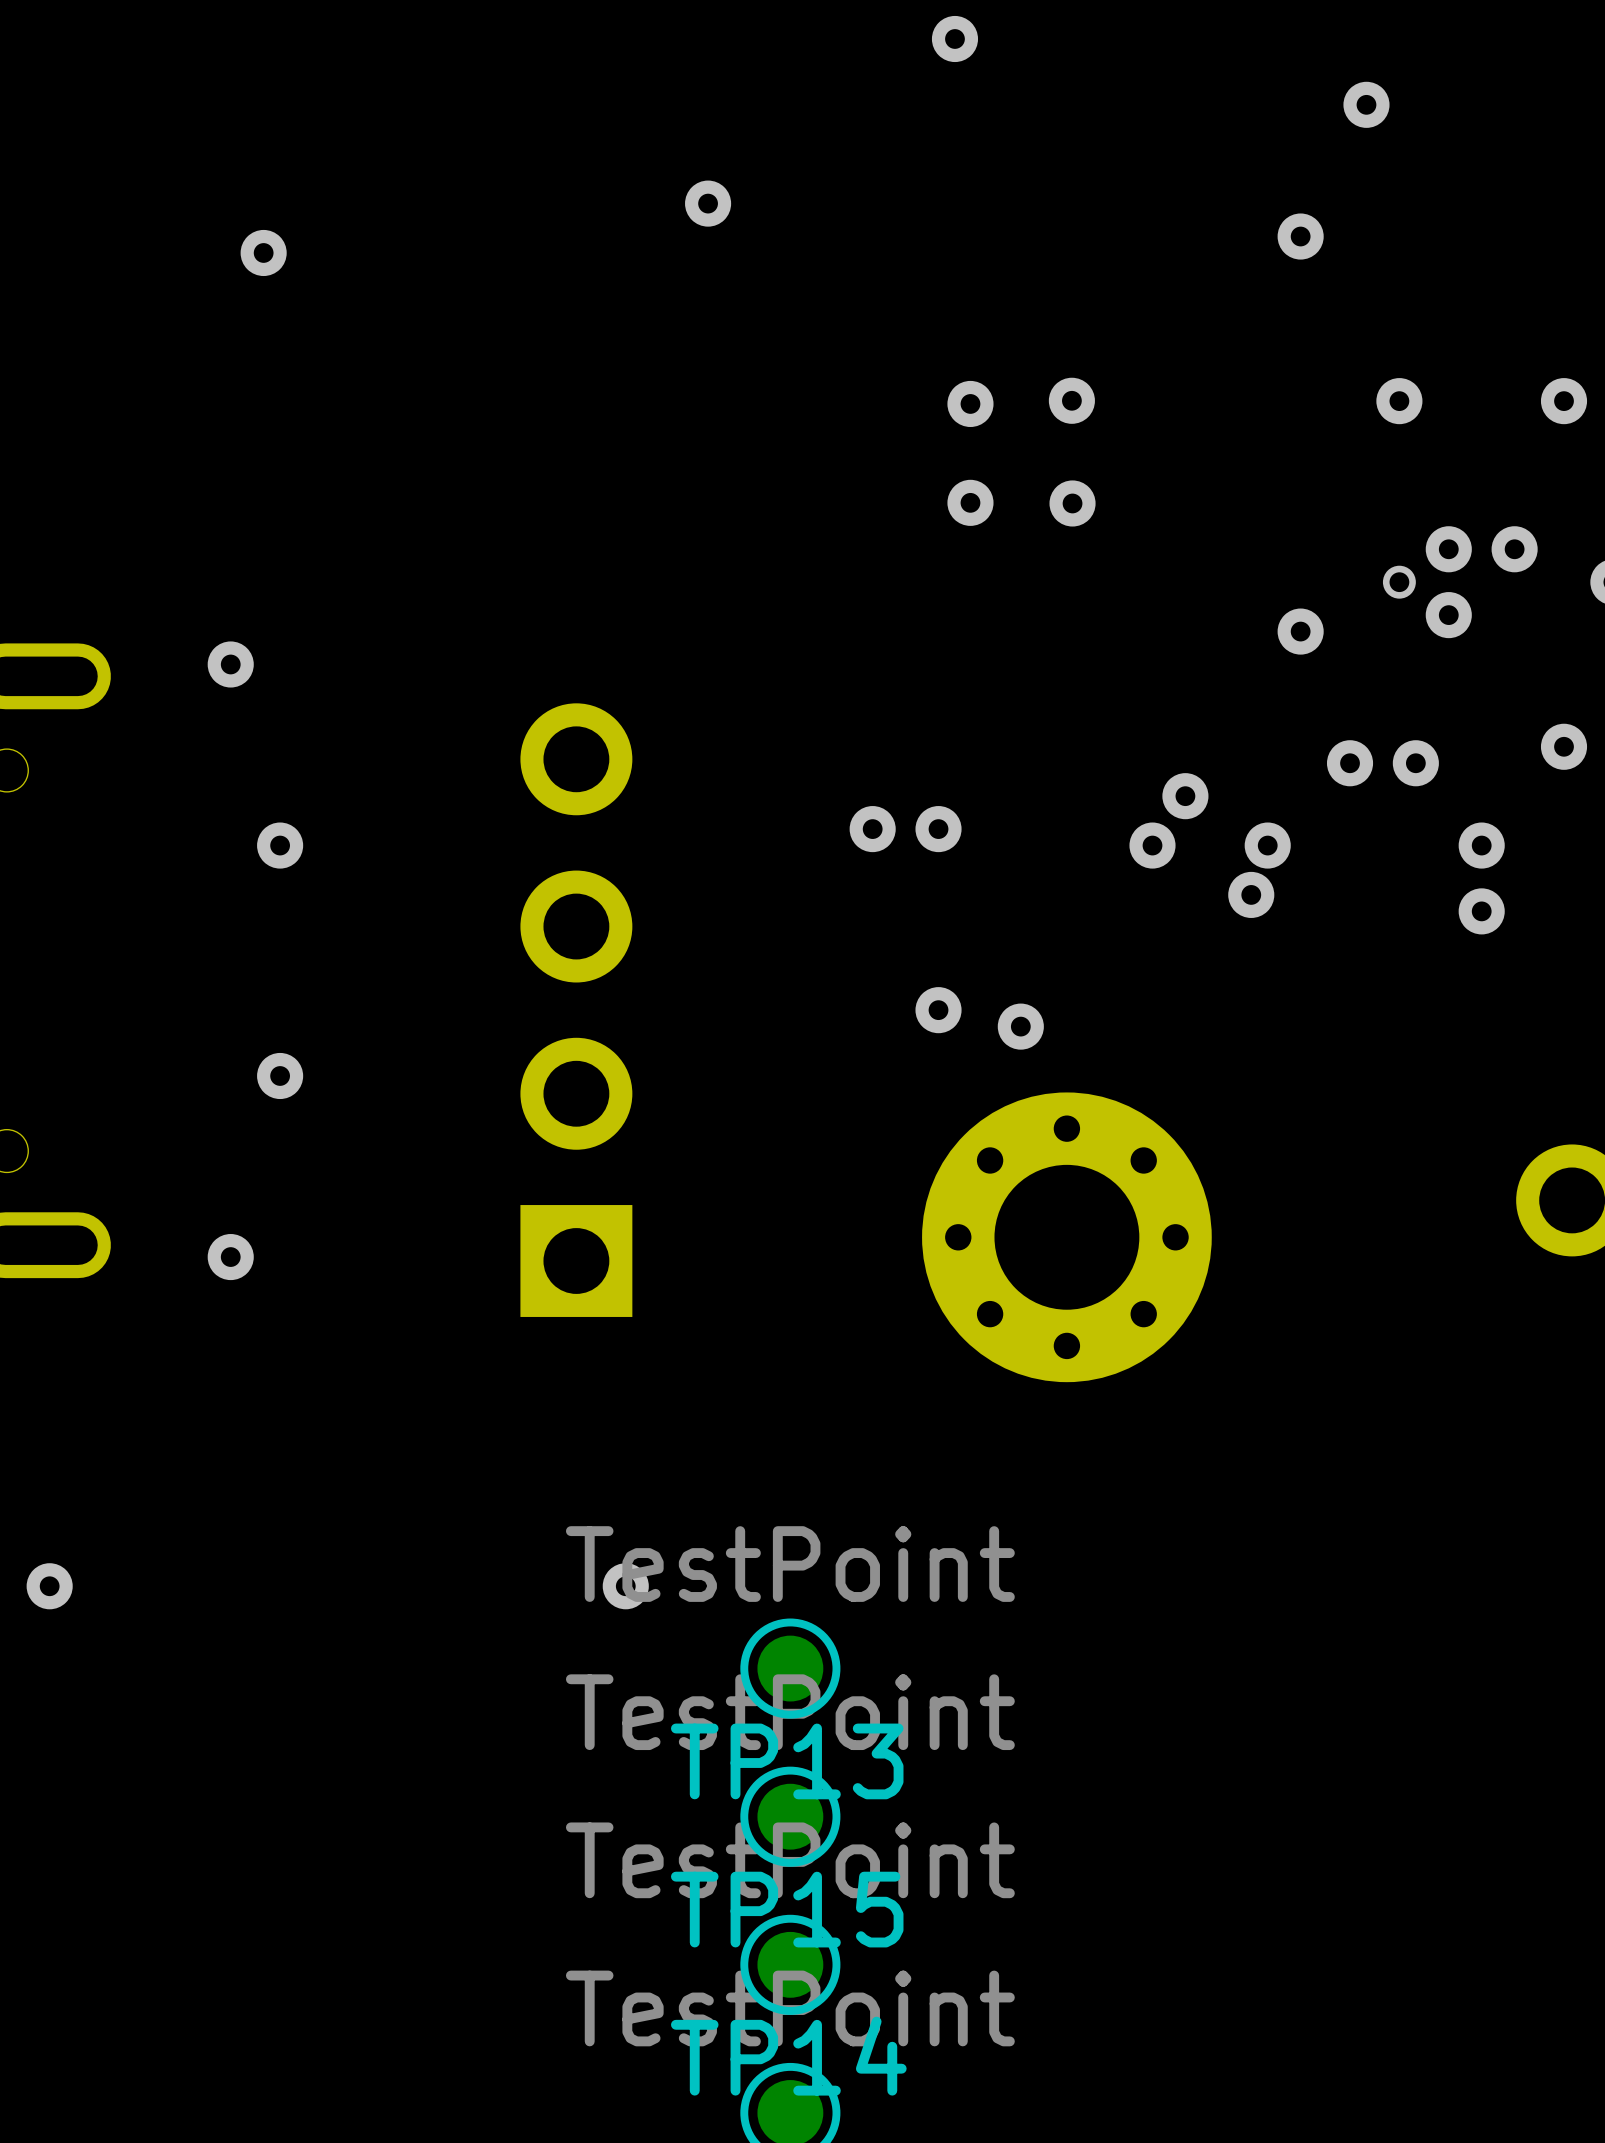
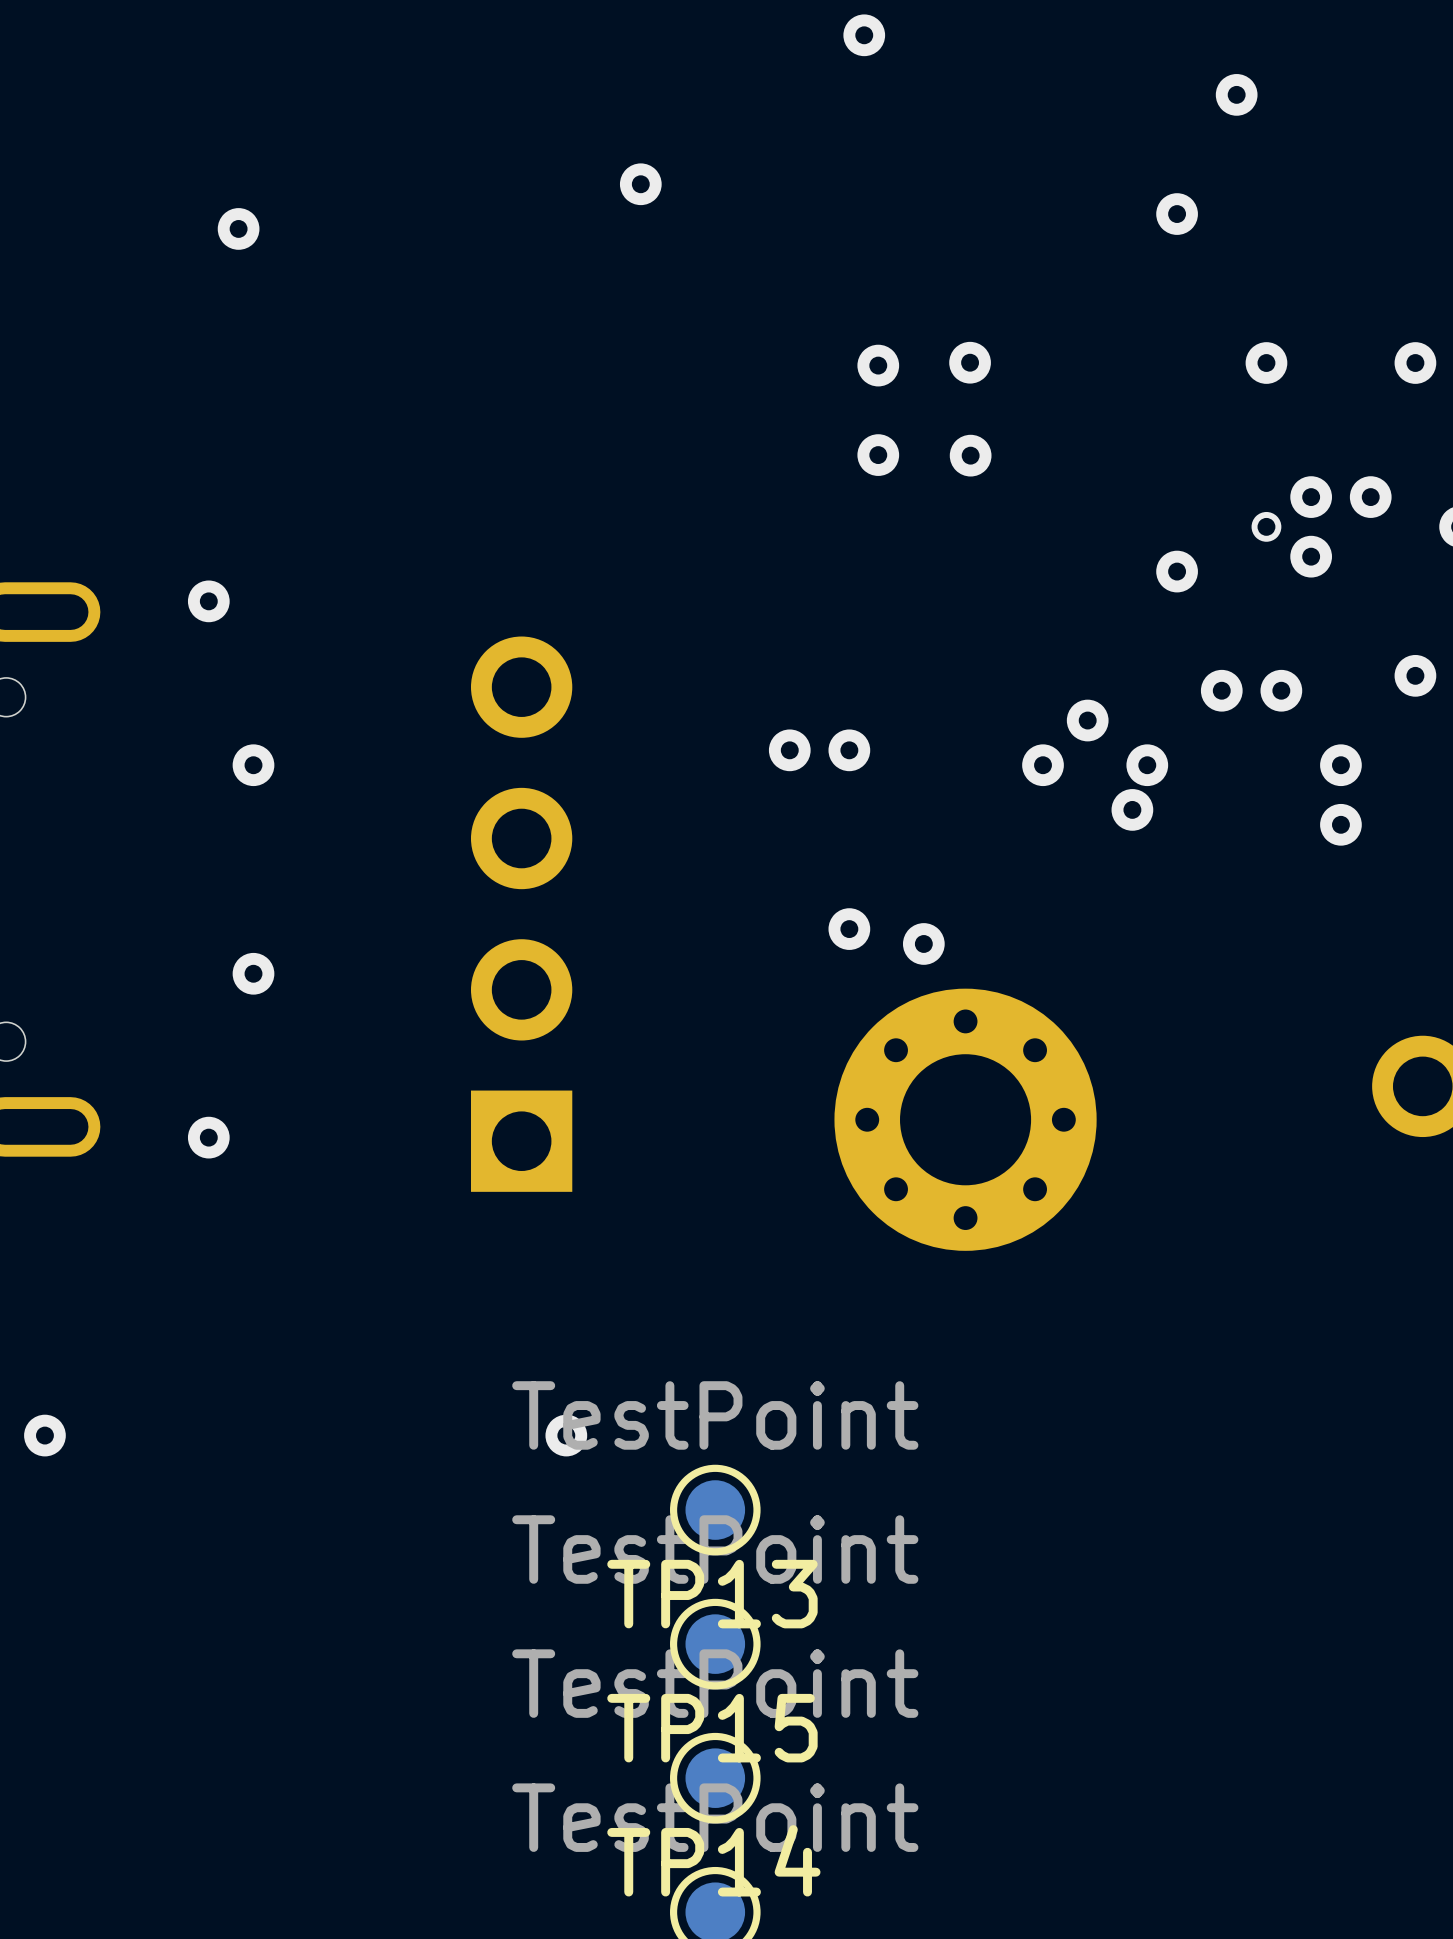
via position: (1185, 796) -> (1087, 720)
via position: (938, 1010) -> (849, 929)
via position: (1020, 1026) -> (923, 943)

